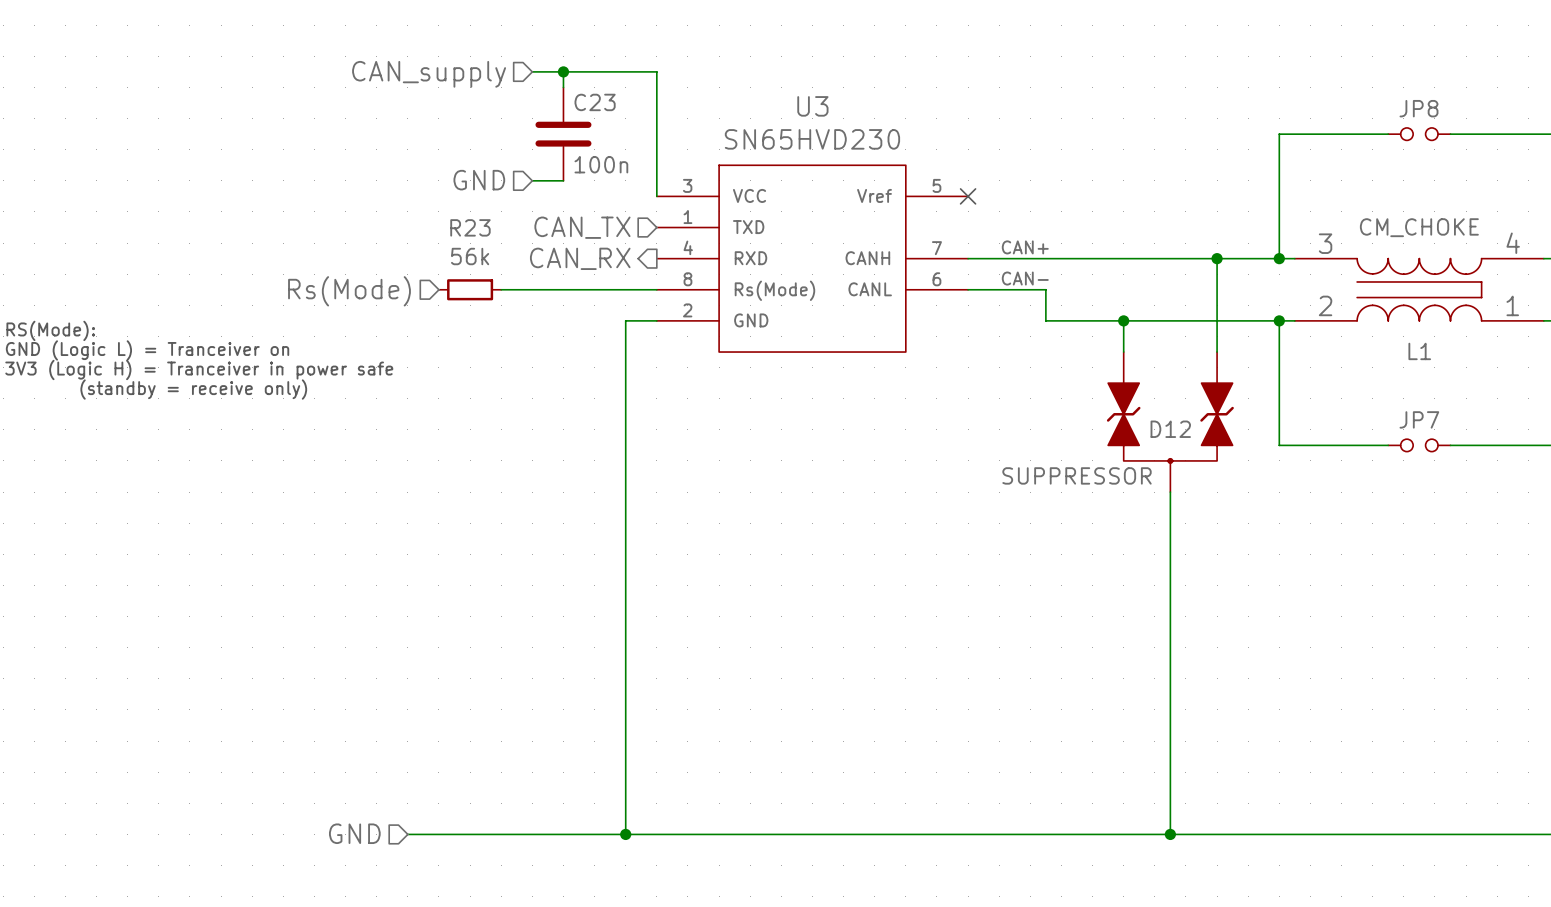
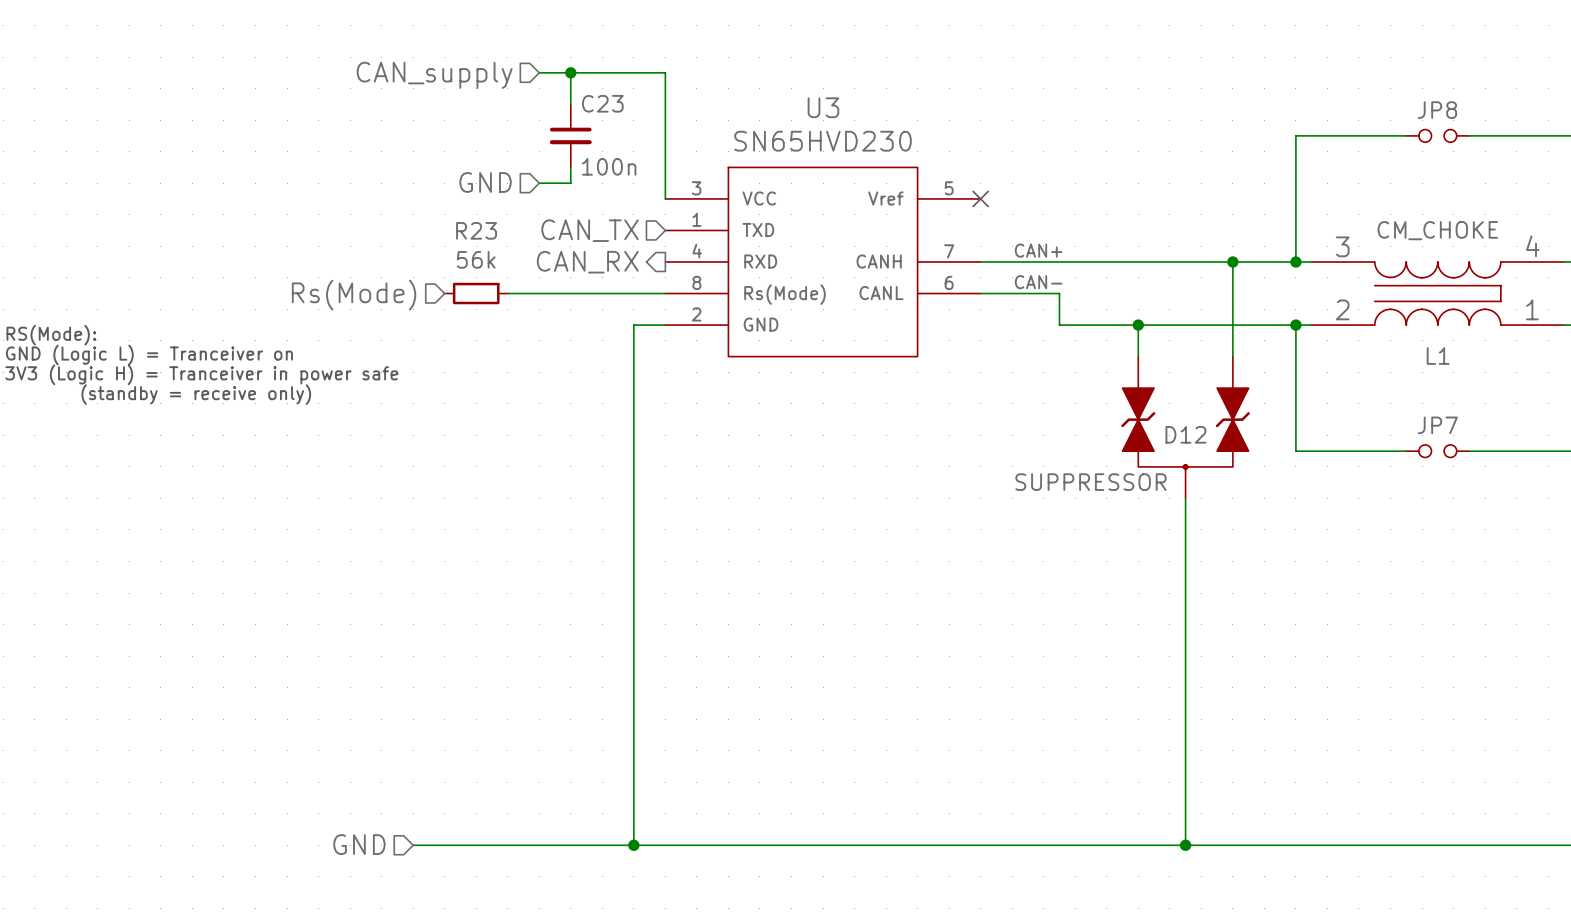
C23 symbol: [535, 87, 592, 181] -> [549, 104, 592, 168]

